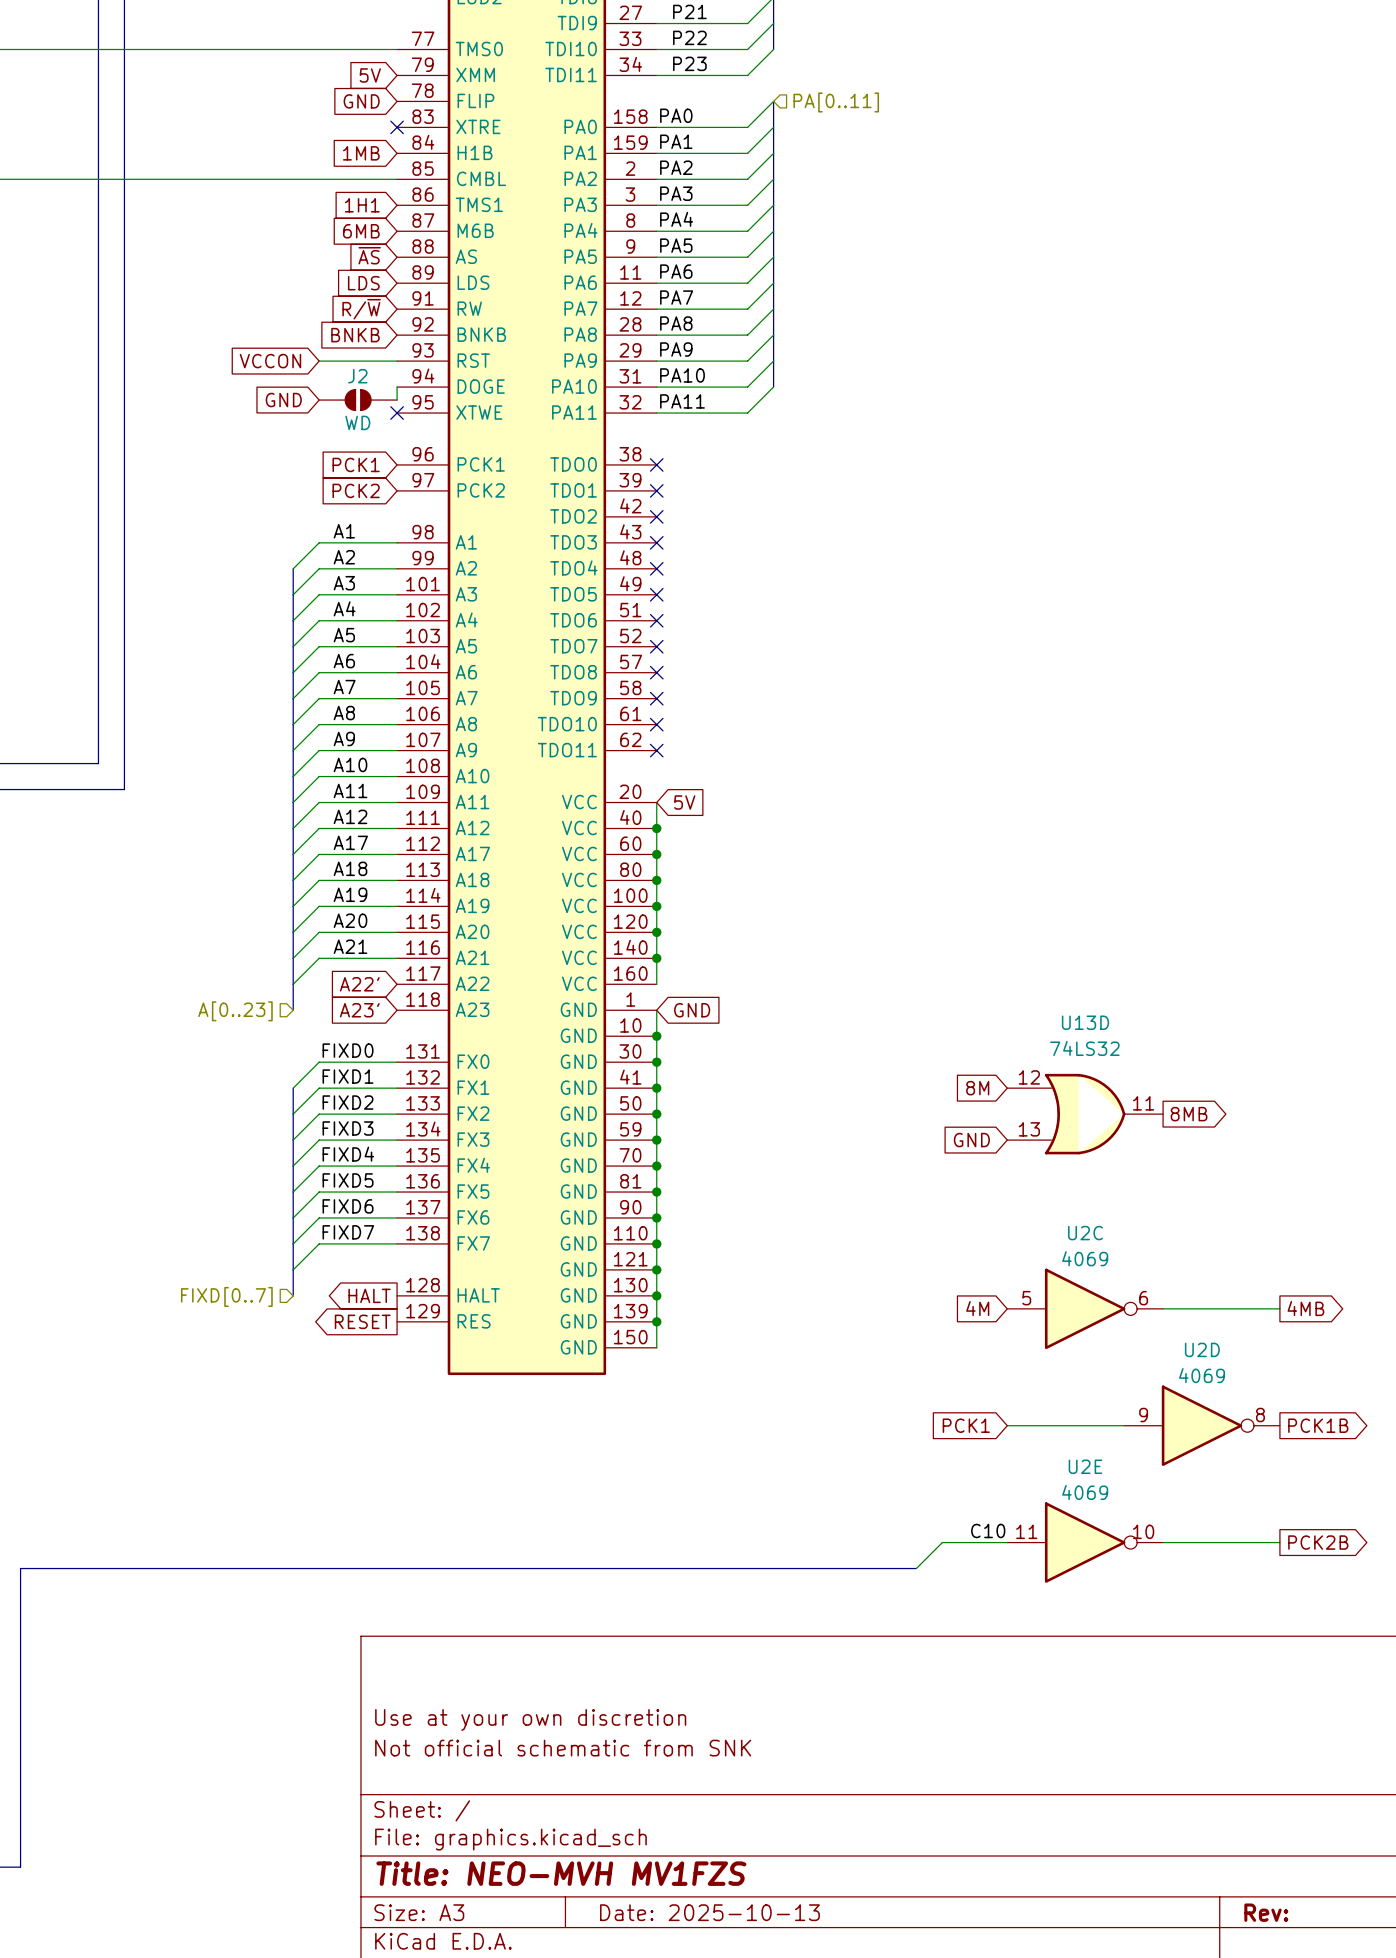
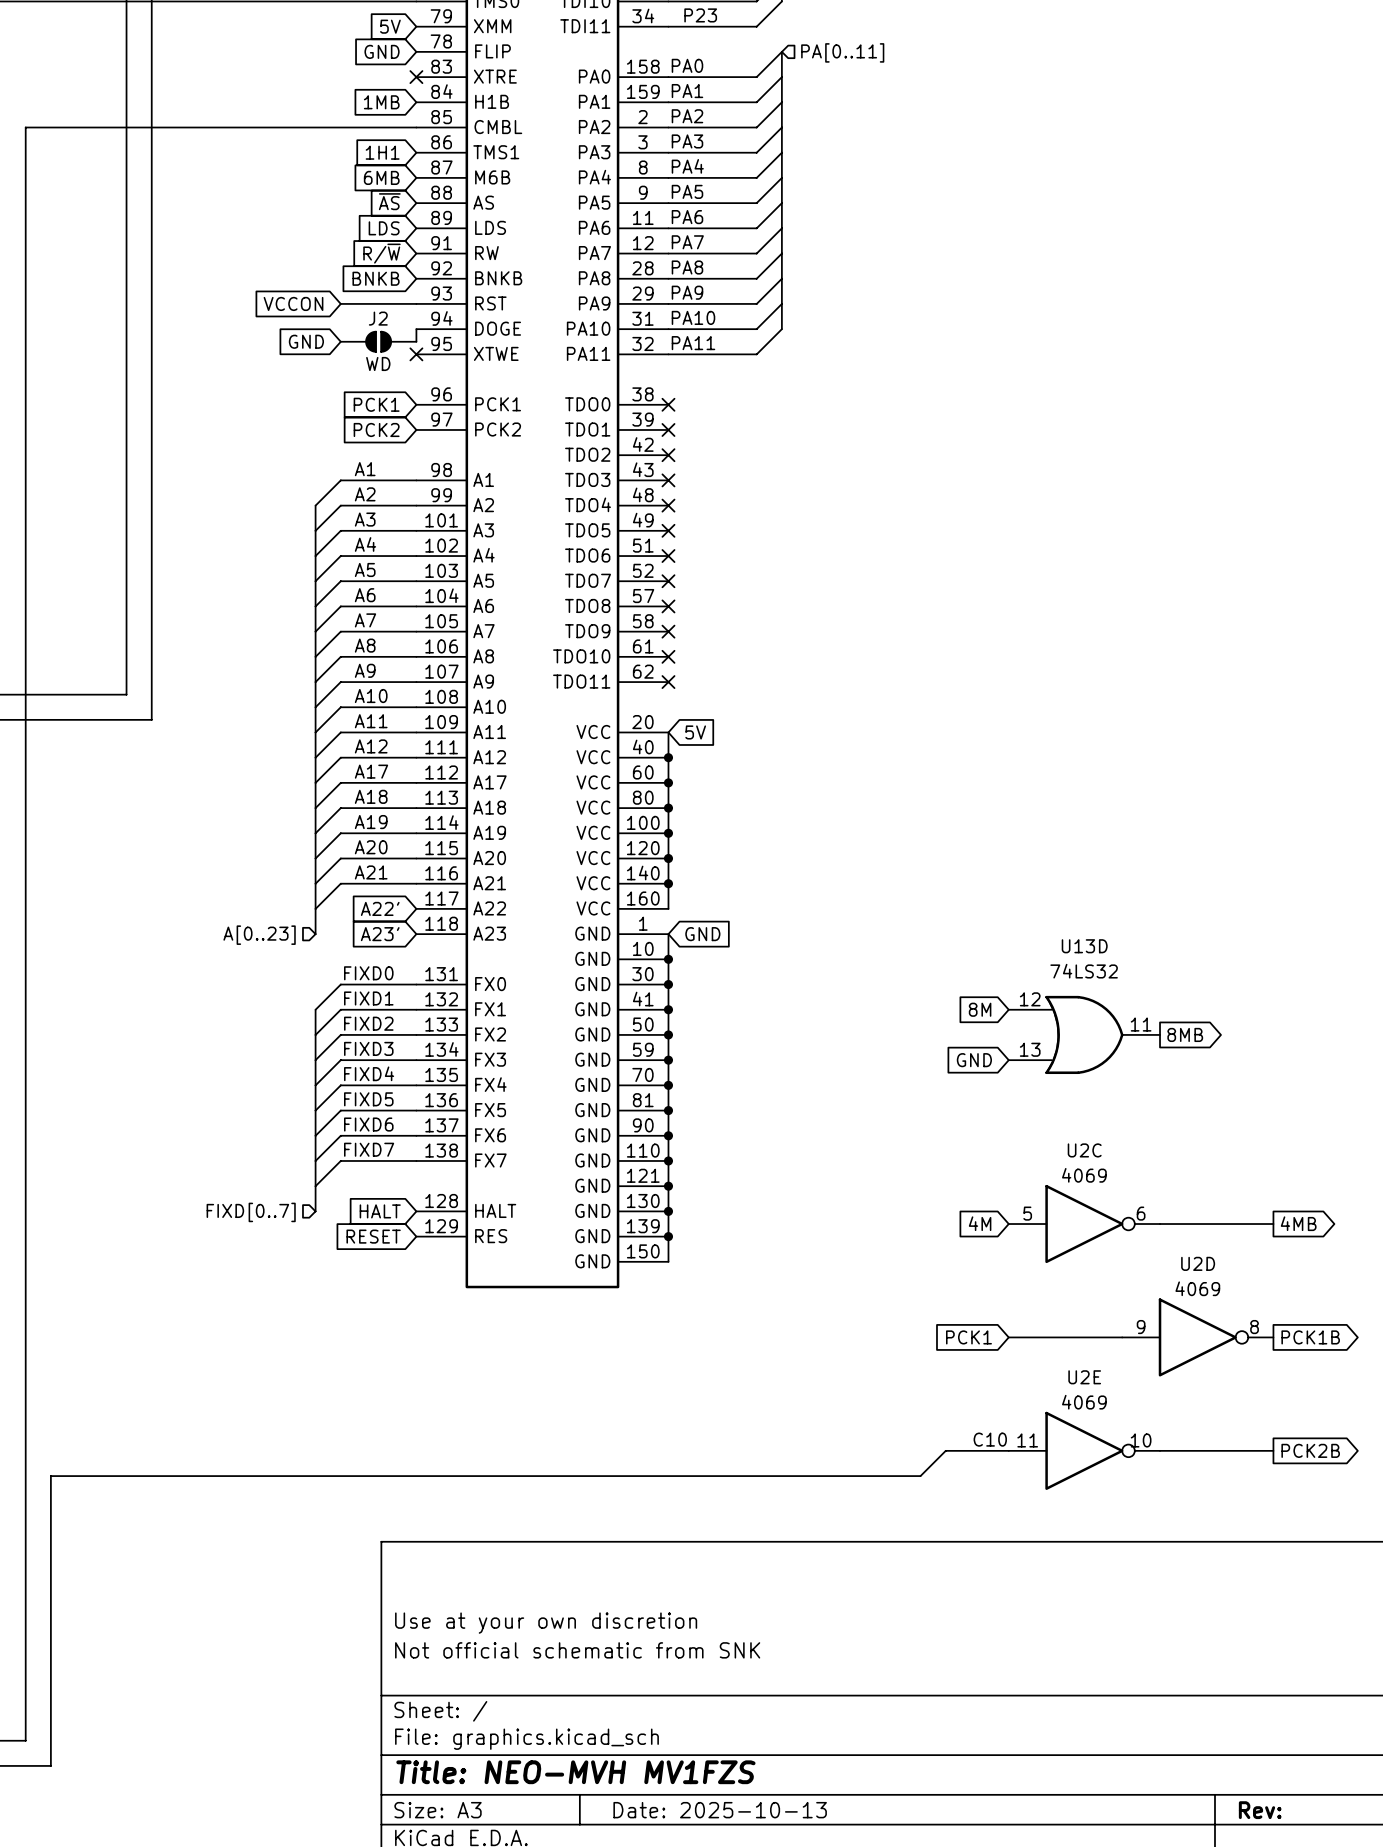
global label shape: output (369, 1295) -> input (380, 1211)
global label shape: output (362, 1321) -> input (373, 1236)

